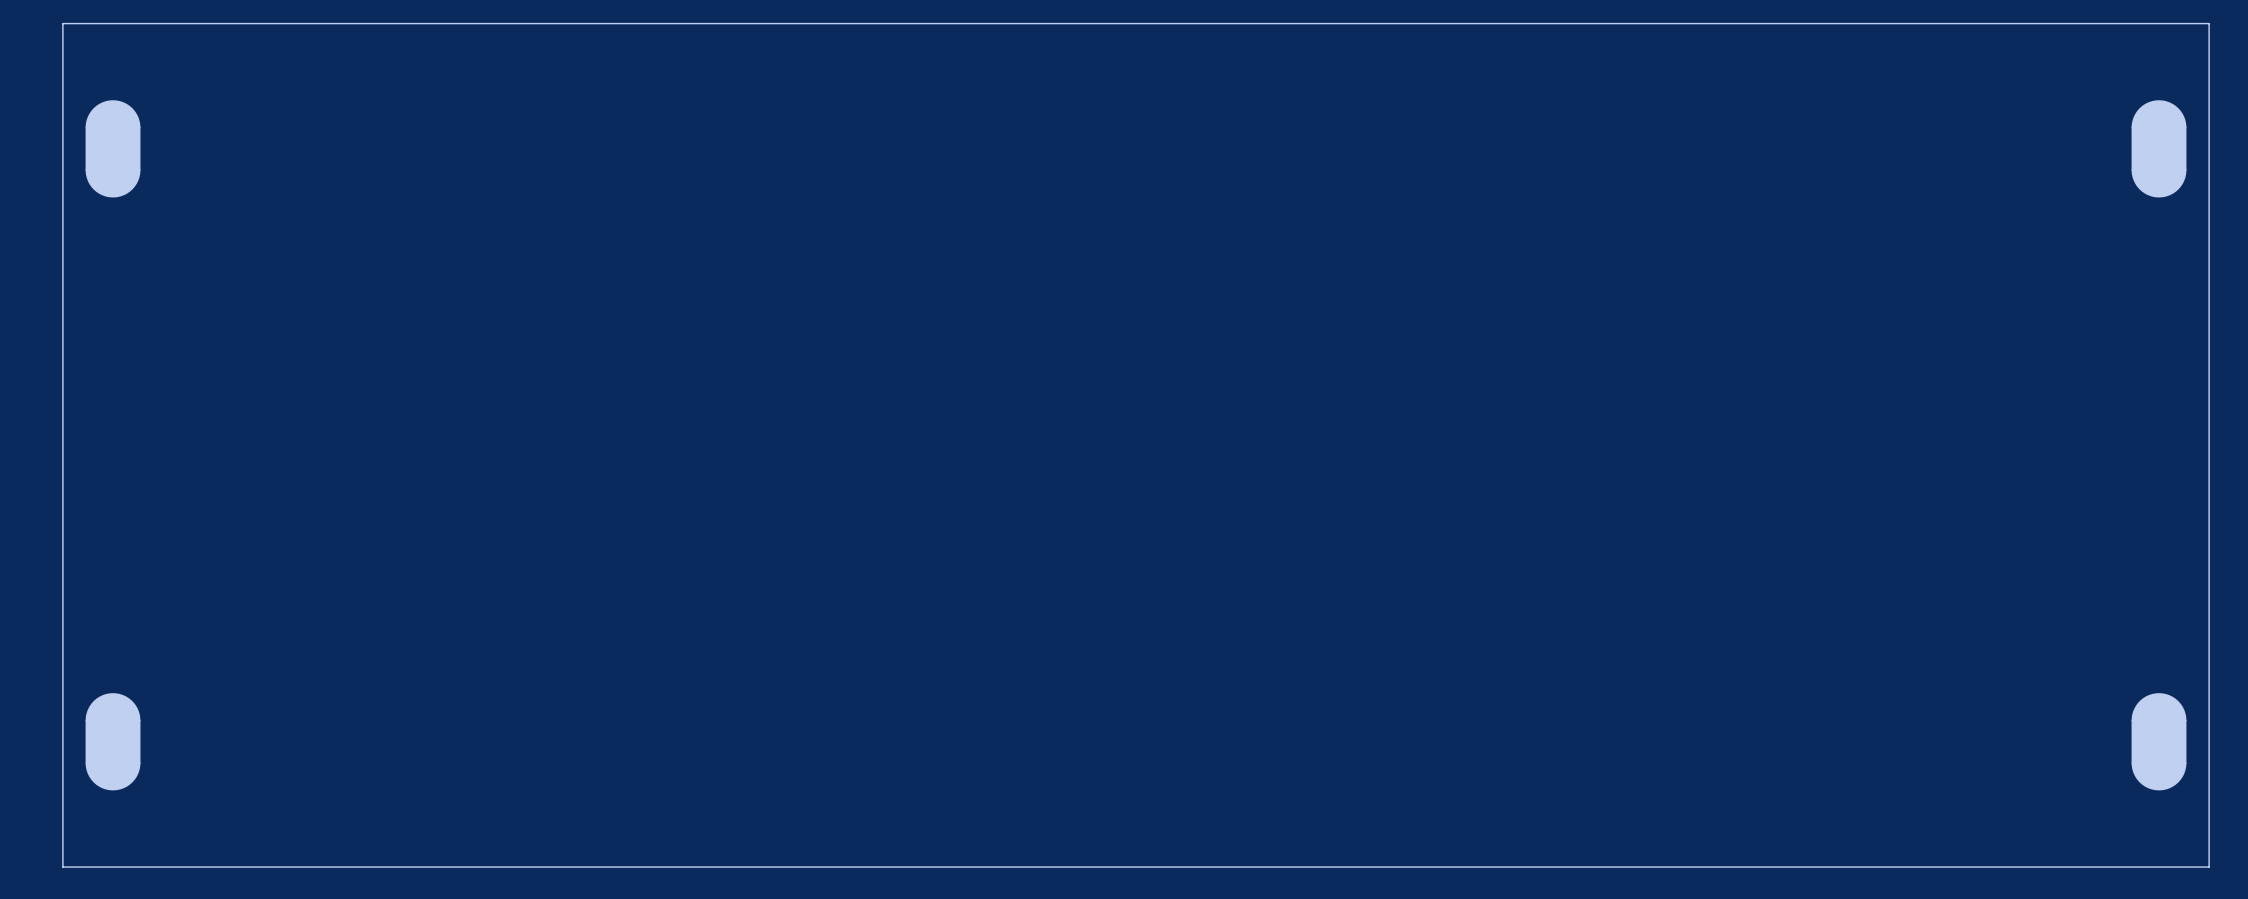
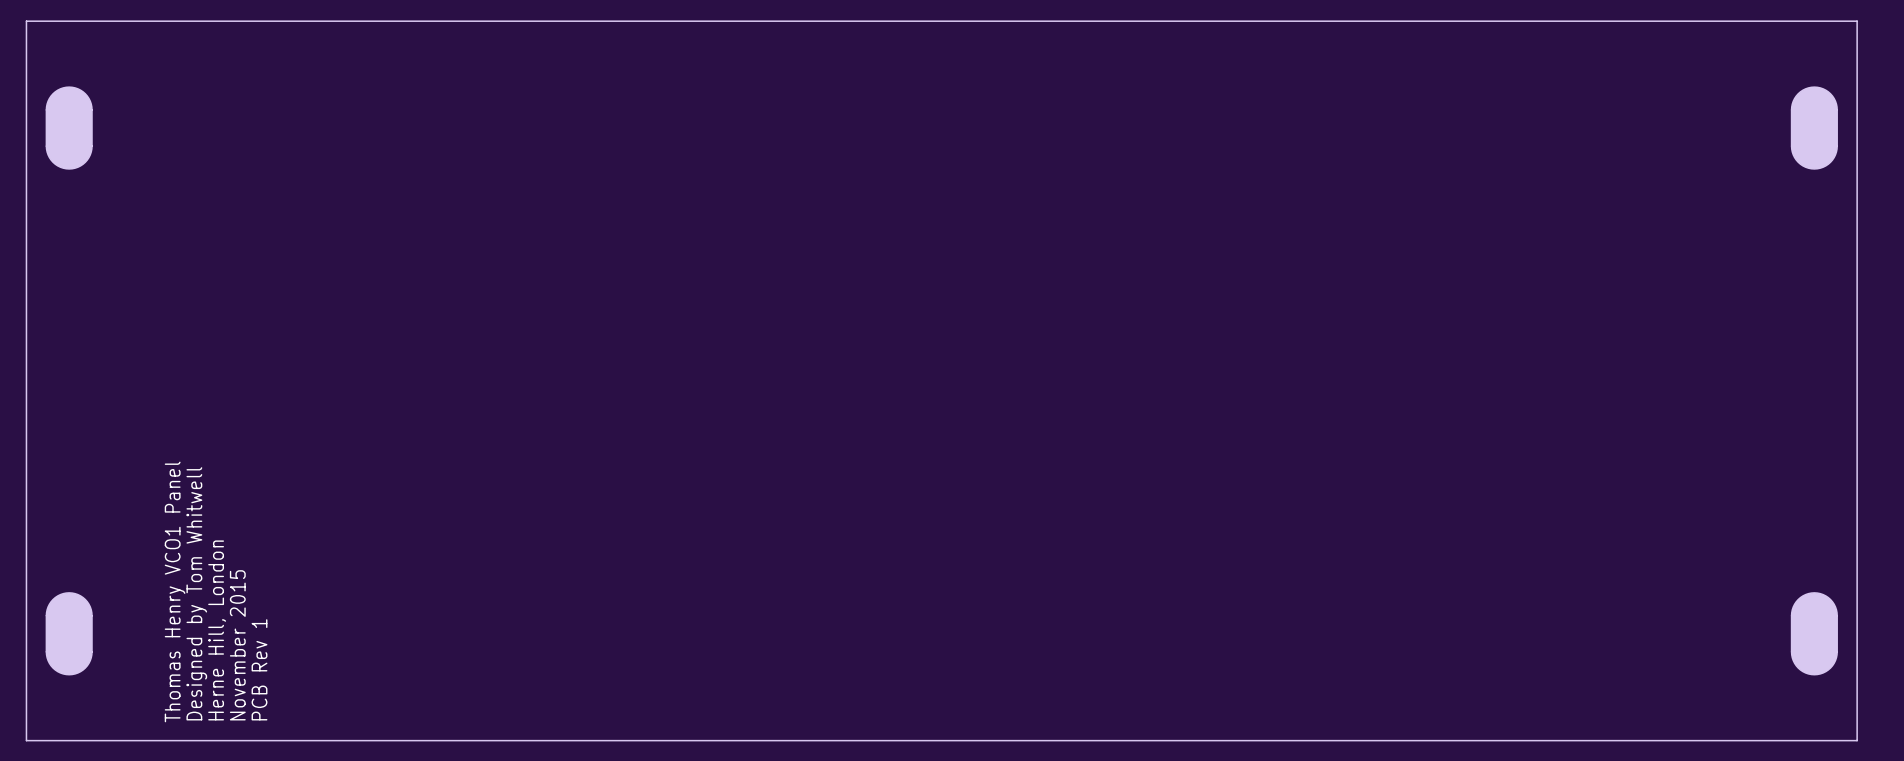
text: none -> Thomas Henry VCO1 Panel (175, 591)
text: none -> Designed by Tom Whitwell (196, 593)
text: none -> Herne Hill, London (217, 630)
text: none -> November 2015 (237, 645)
text: none -> PCB Rev 1 (259, 669)

